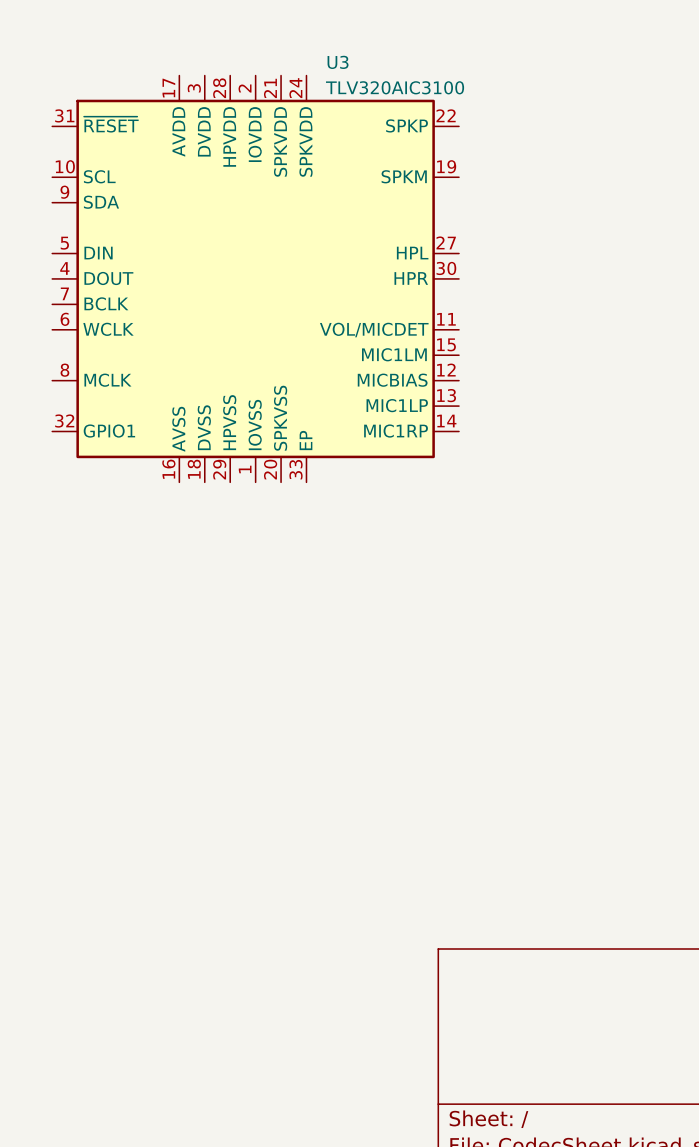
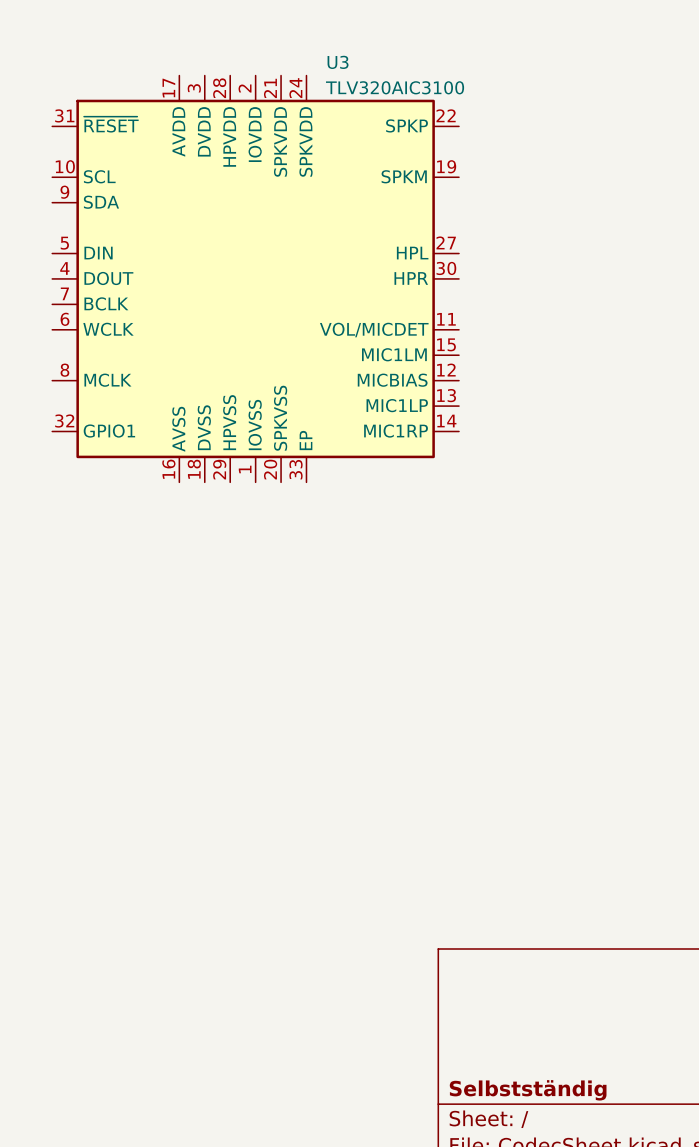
title block: none -> Selbstständig (528, 1090)

